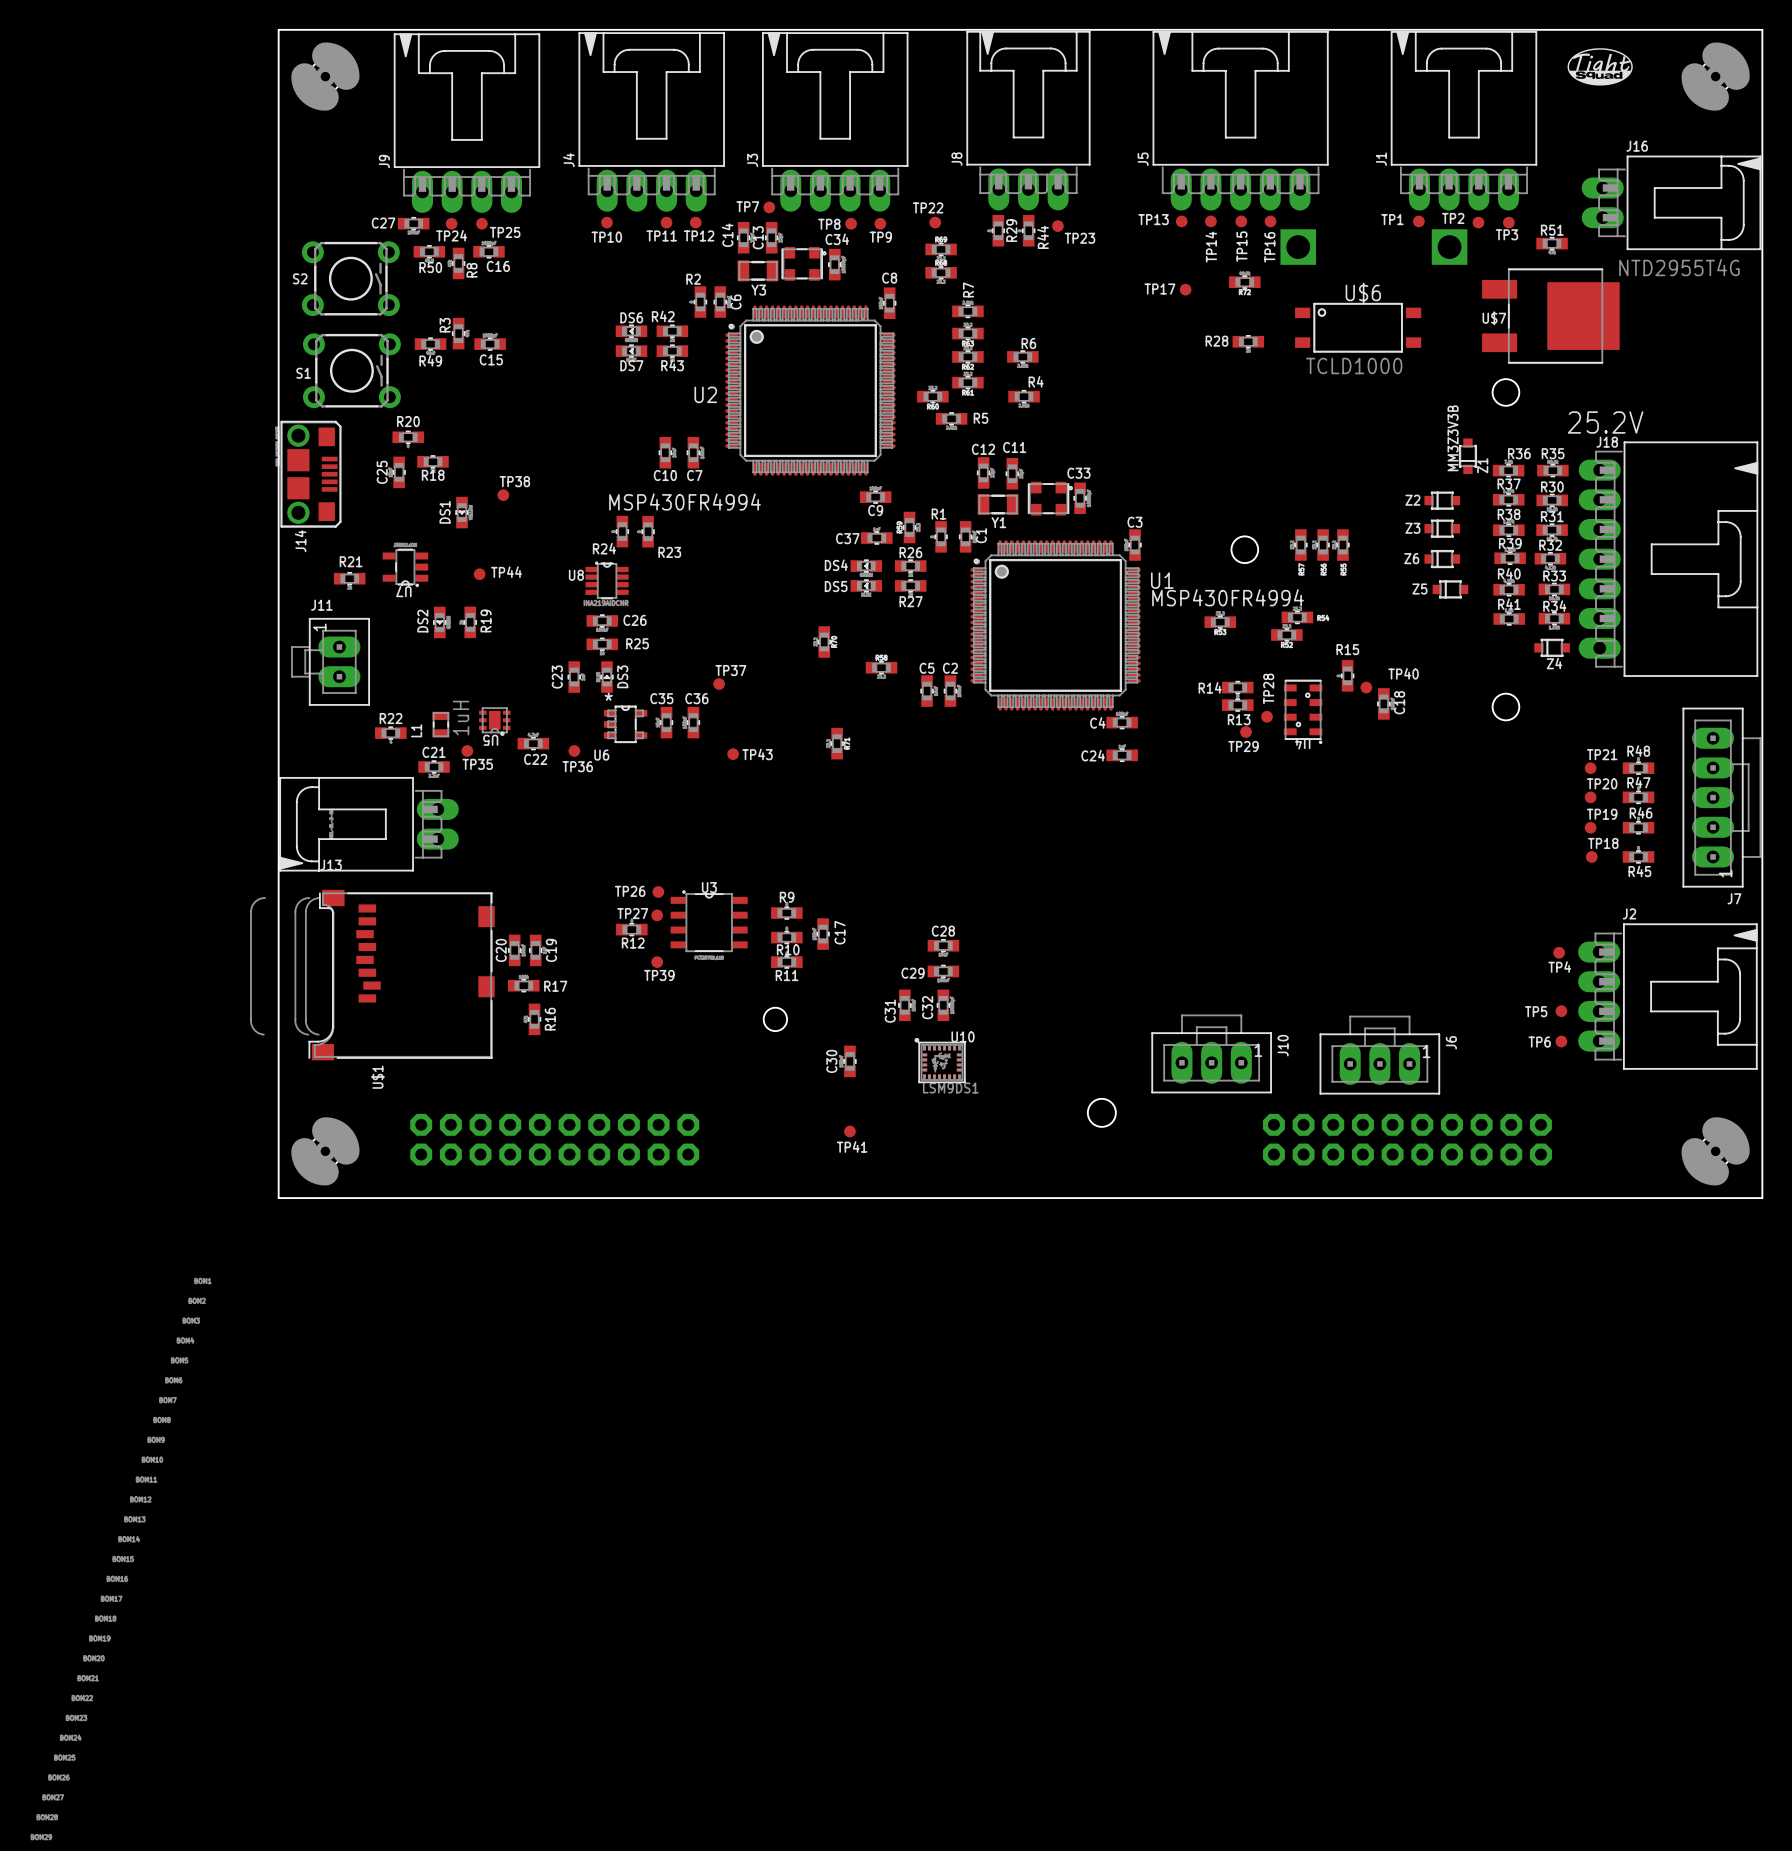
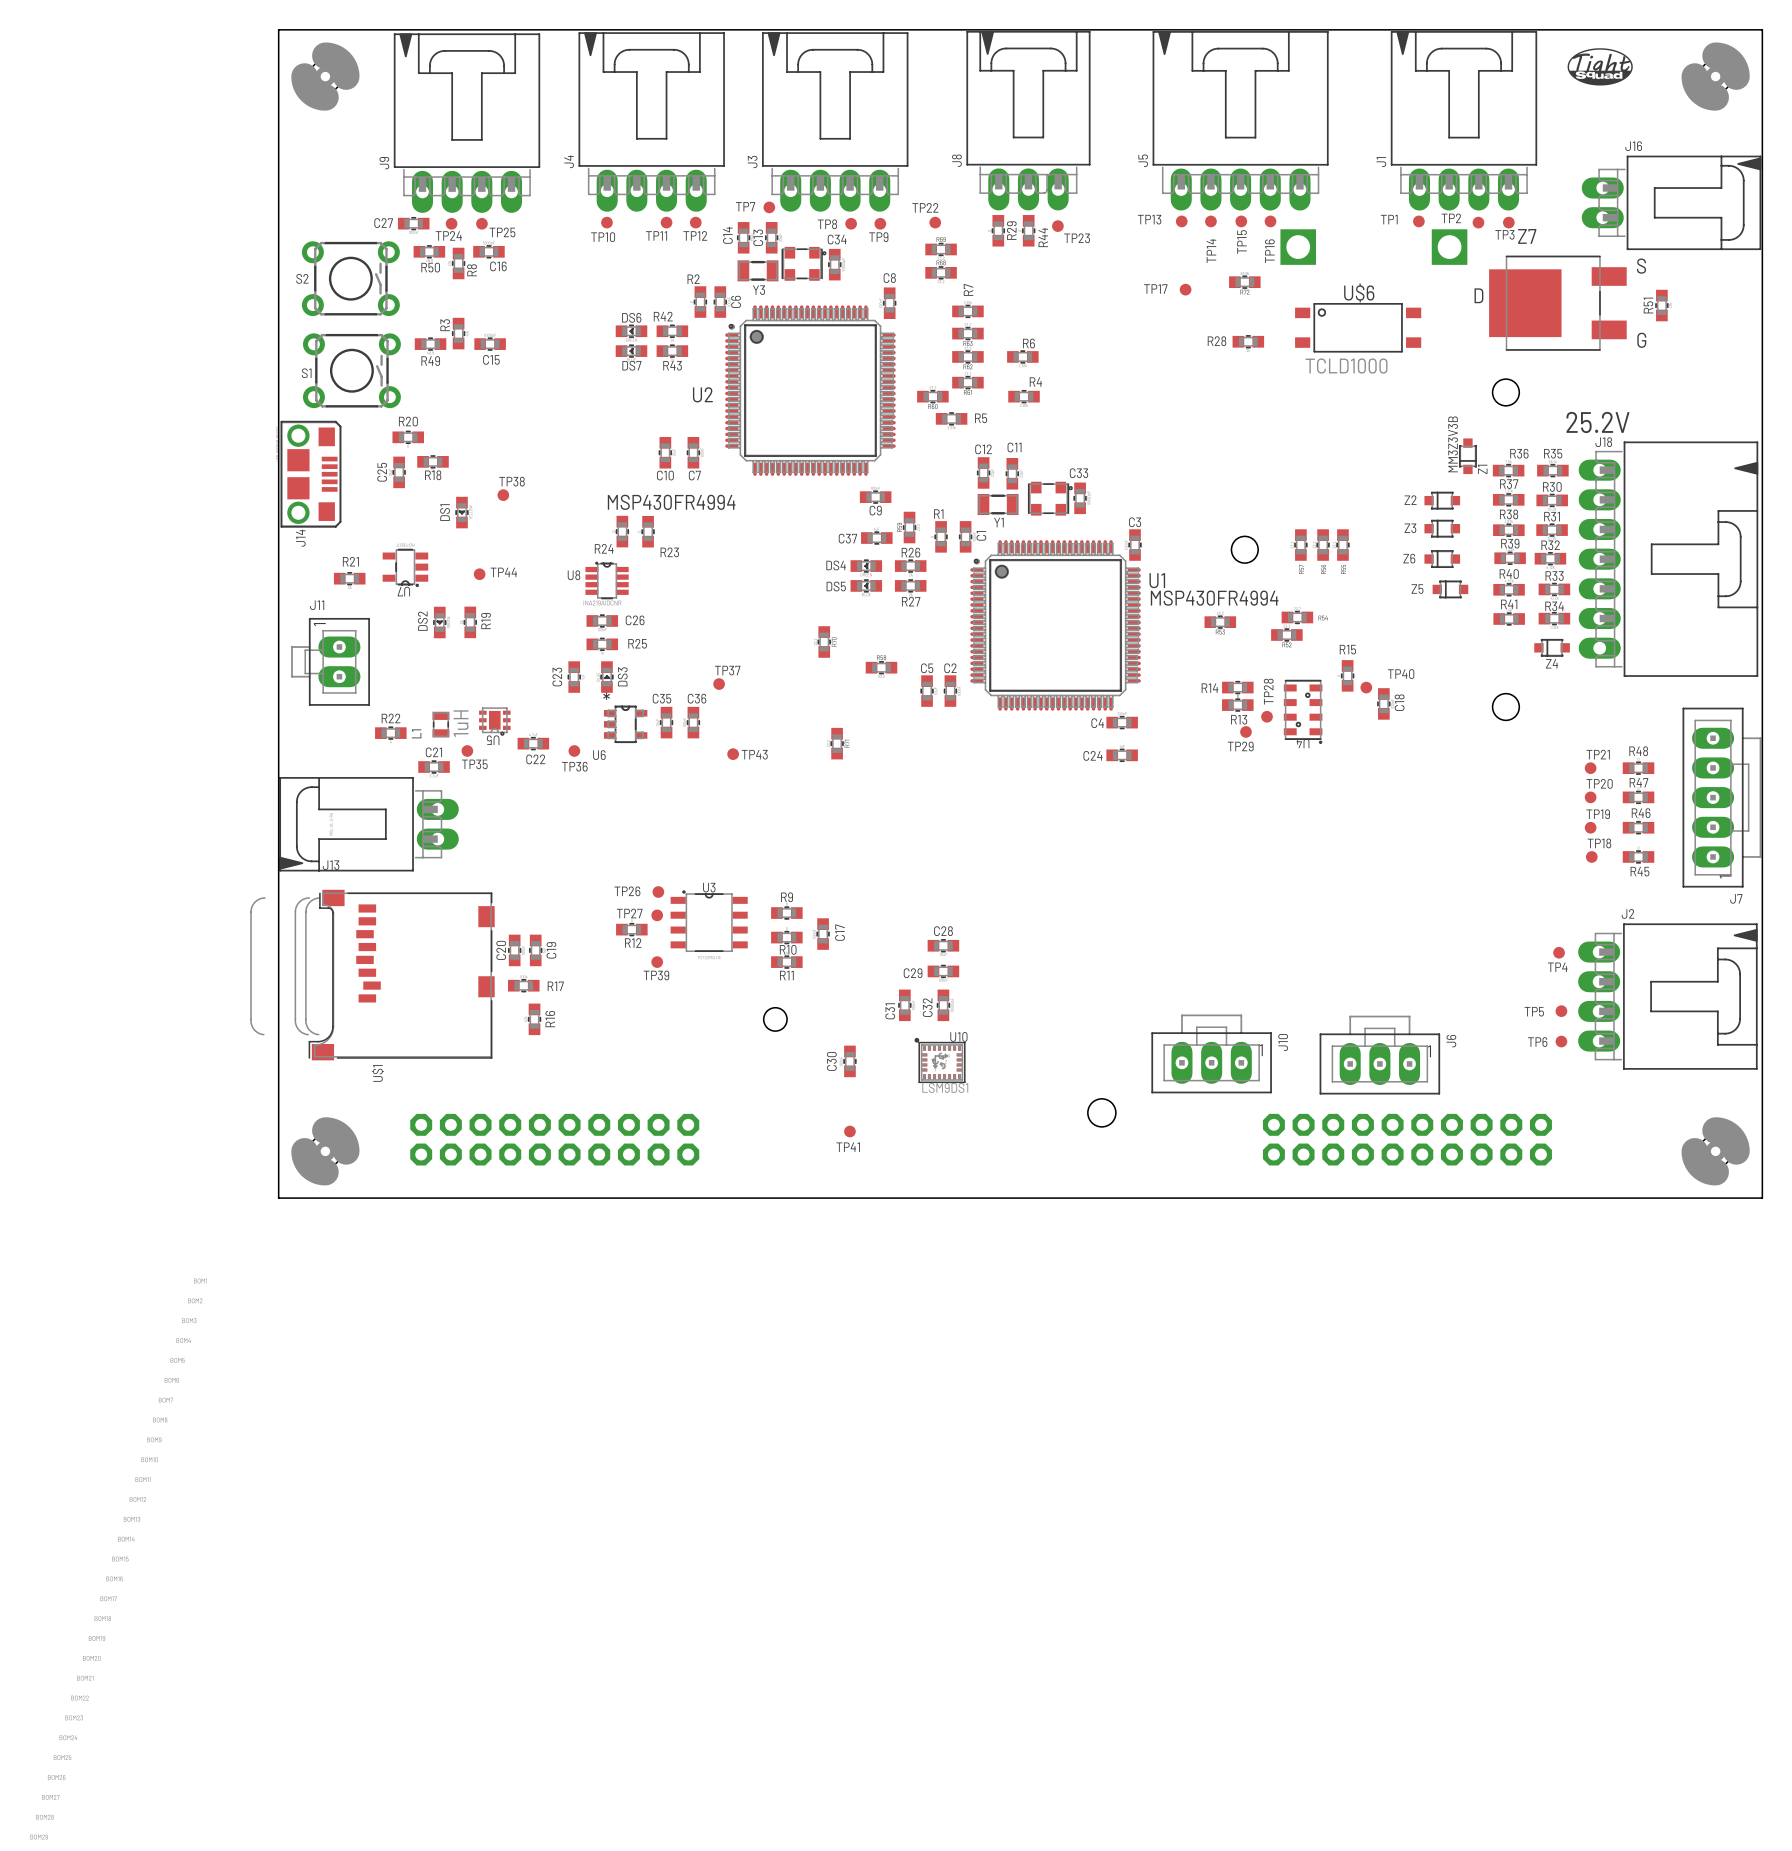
R51 rotation: 0° (1552, 243) -> 90° clockwise (1661, 305)
R51 position: (1552, 243) -> (1661, 305)
Z7: none -> (1557, 303)
U$7: NTD2955T4G (1550, 316) -> none

